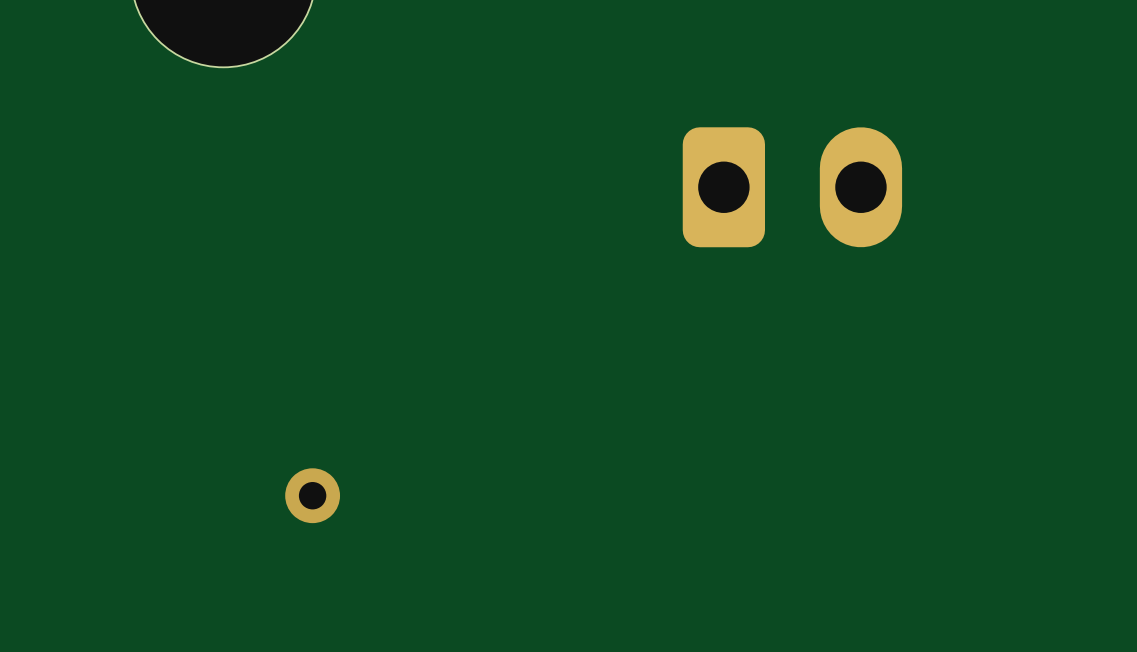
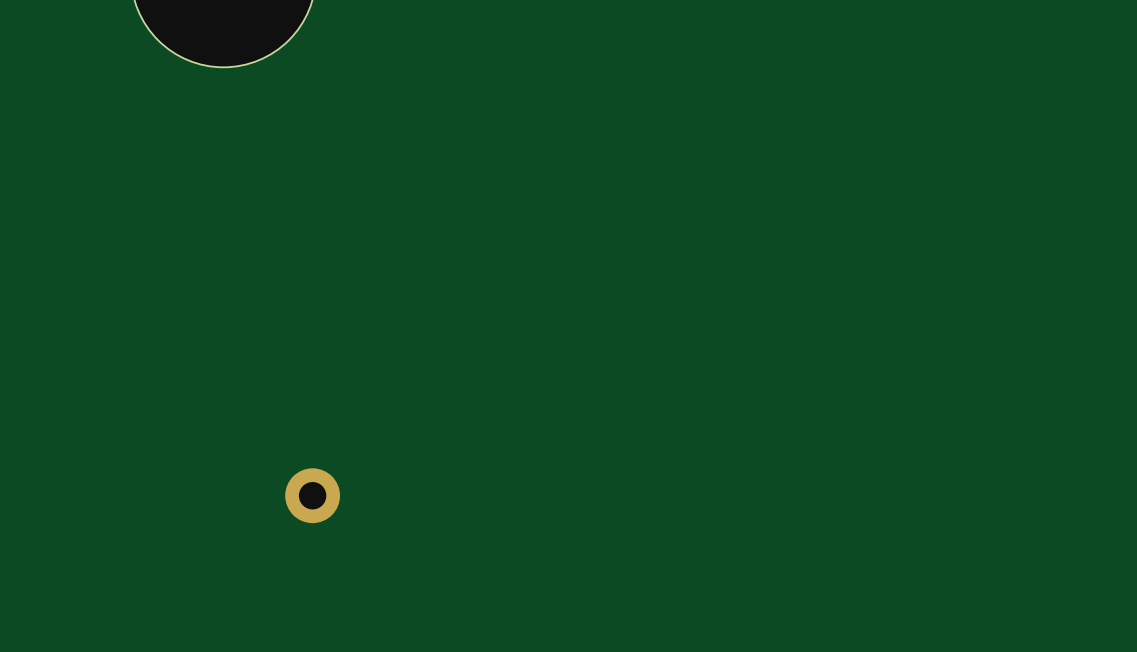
part: (792, 187) -> none

